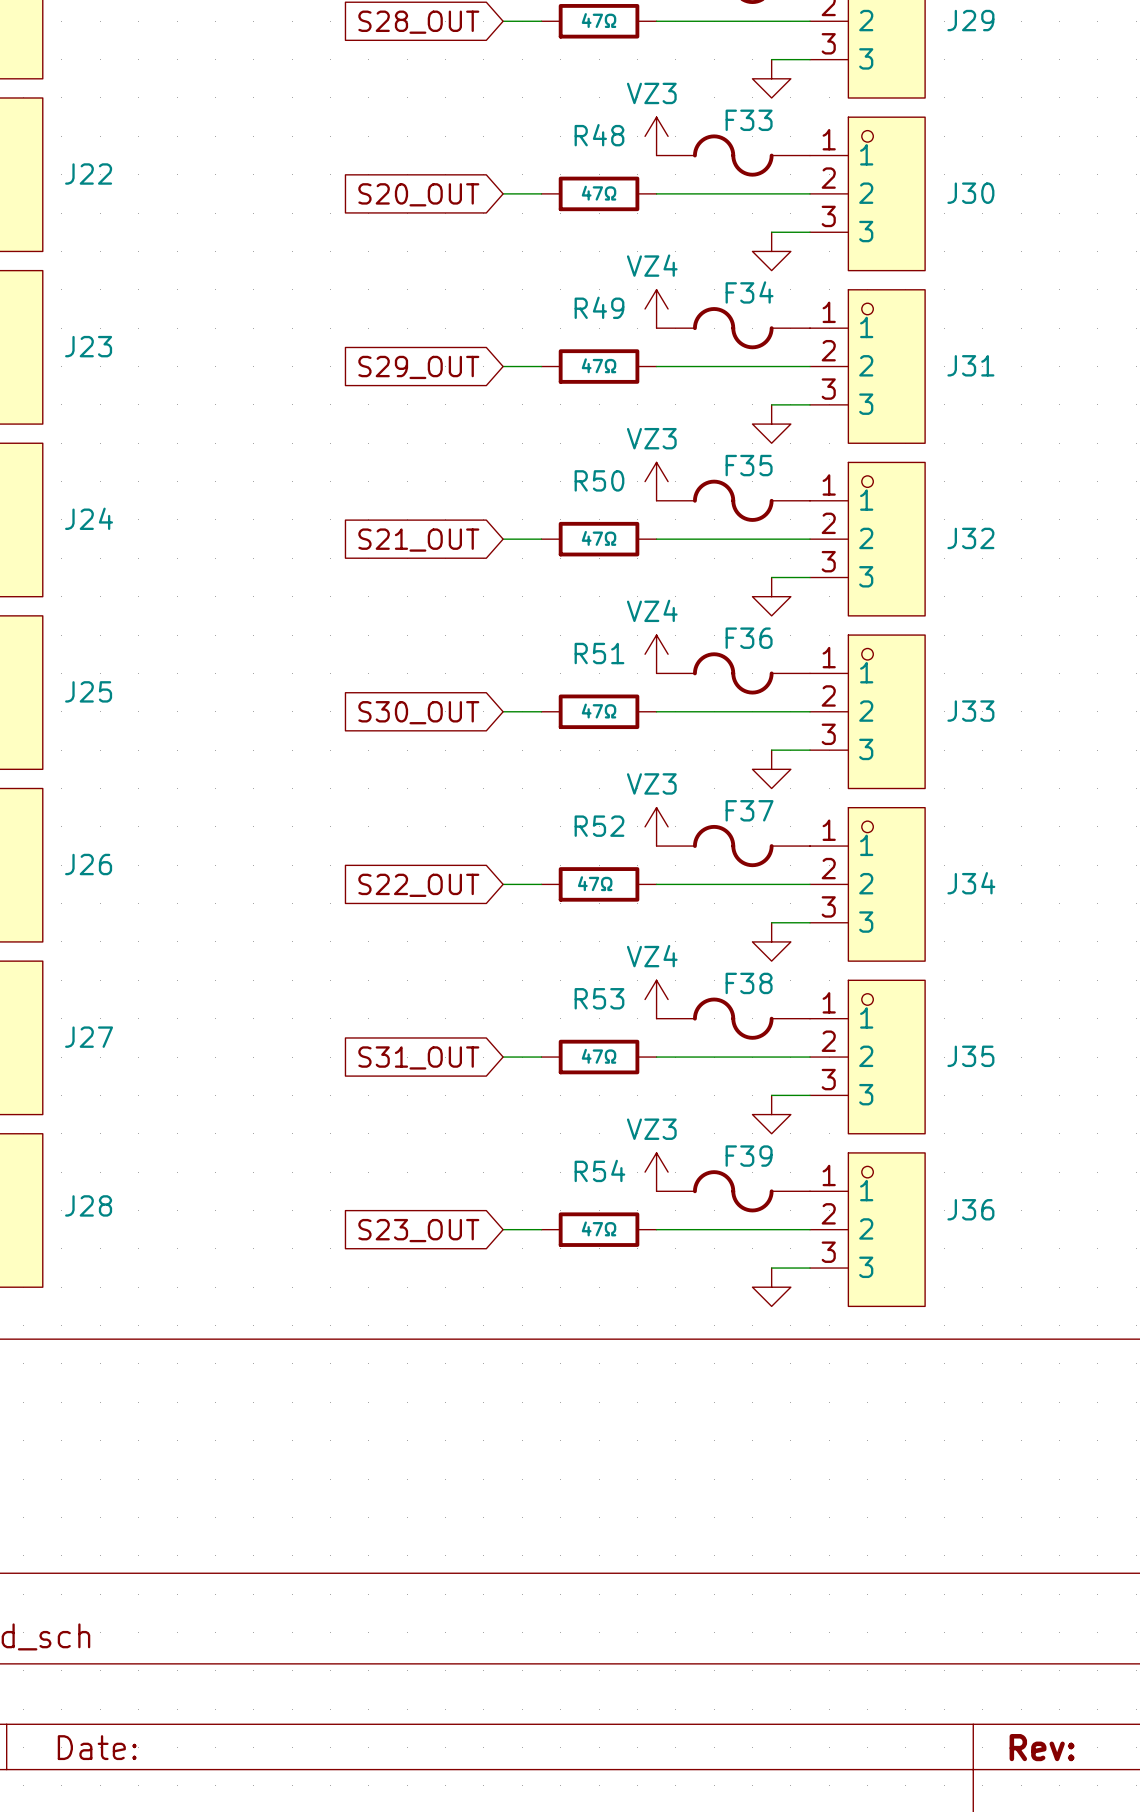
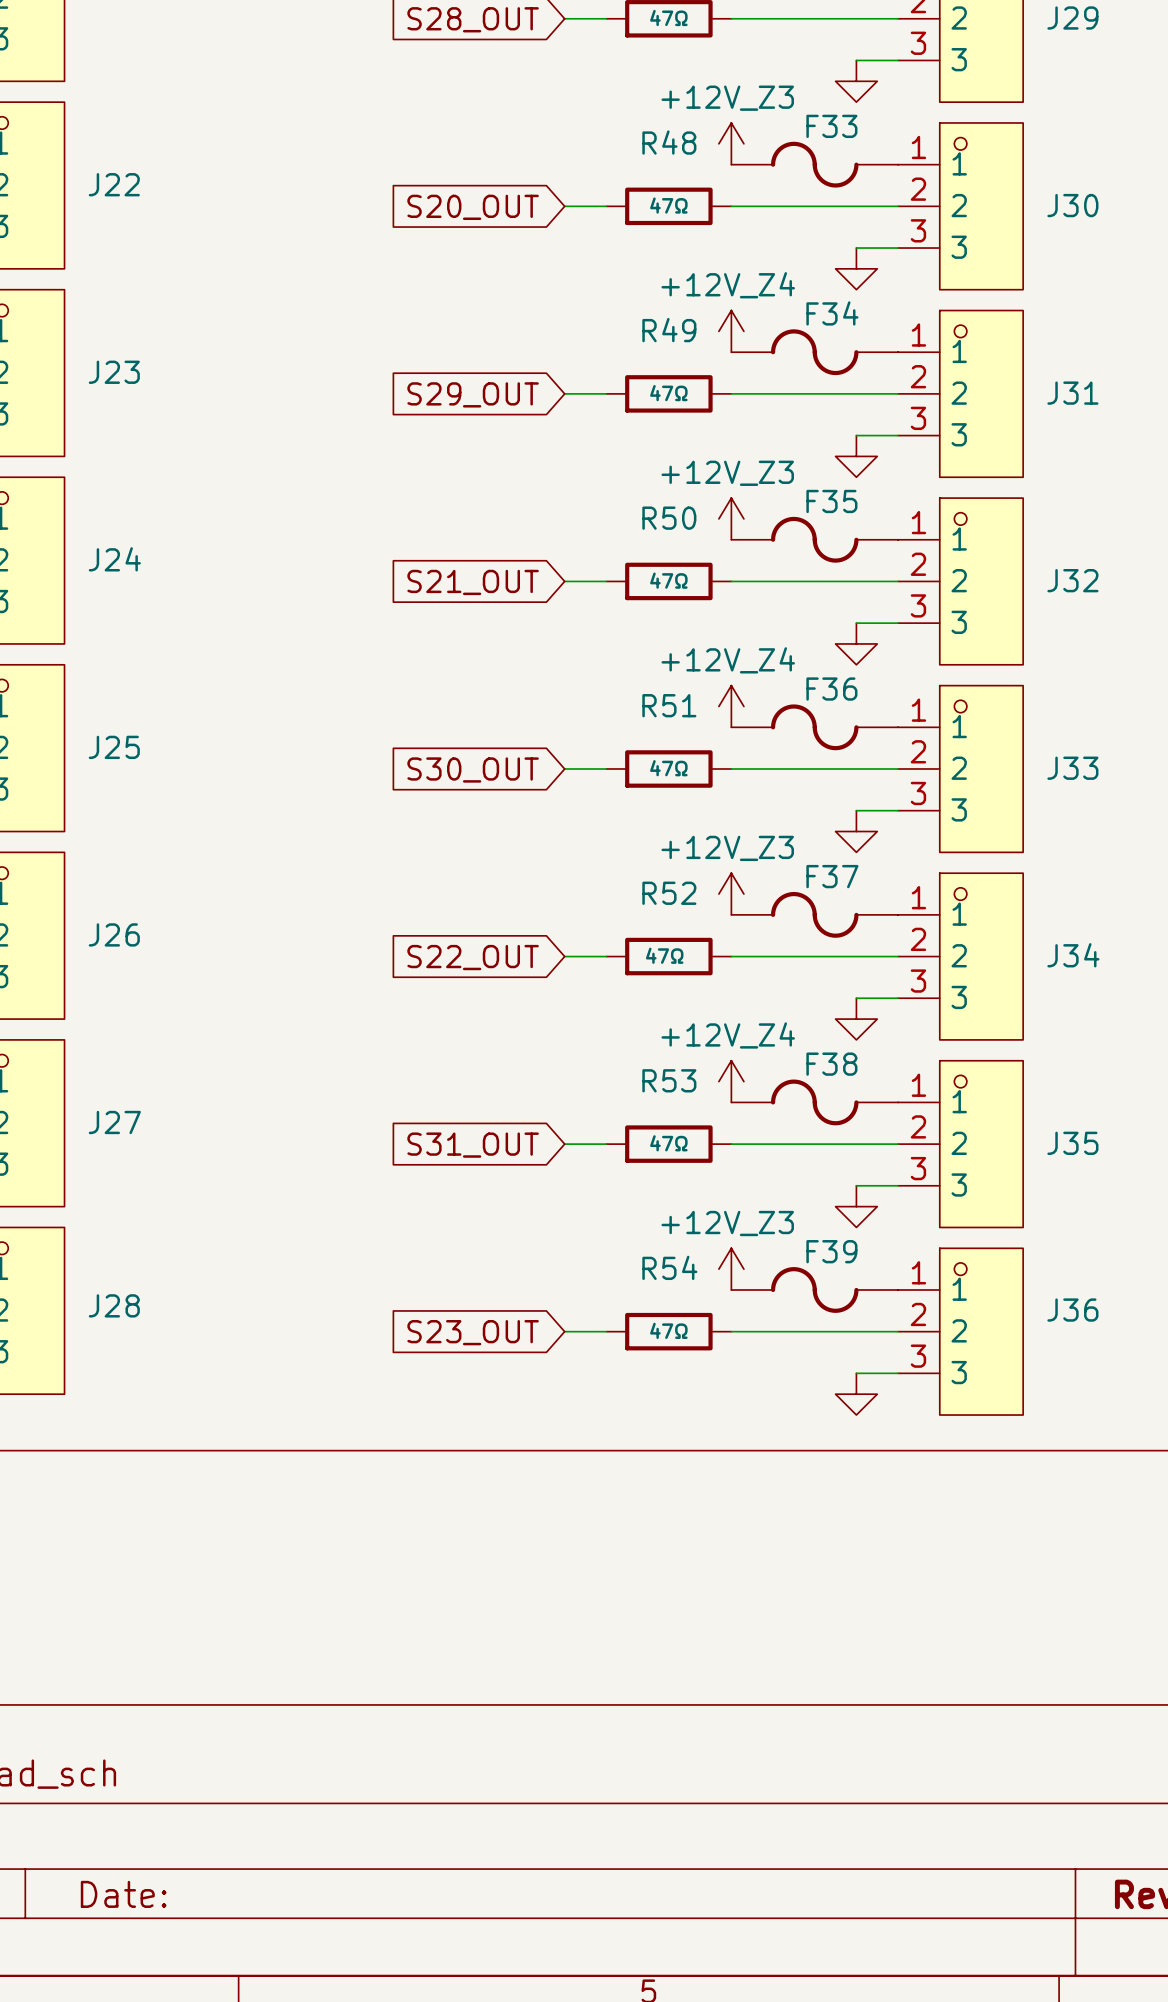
power symbol: VZ3 (656, 136) -> +12V_Z3 (731, 143)
power symbol: VZ4 (656, 308) -> +12V_Z4 (731, 331)
power symbol: VZ3 (656, 481) -> +12V_Z3 (731, 518)
power symbol: VZ4 (656, 654) -> +12V_Z4 (731, 706)
power symbol: VZ3 (656, 826) -> +12V_Z3 (731, 894)
power symbol: VZ4 (656, 999) -> +12V_Z4 (731, 1081)
power symbol: VZ3 (656, 1172) -> +12V_Z3 (731, 1269)

